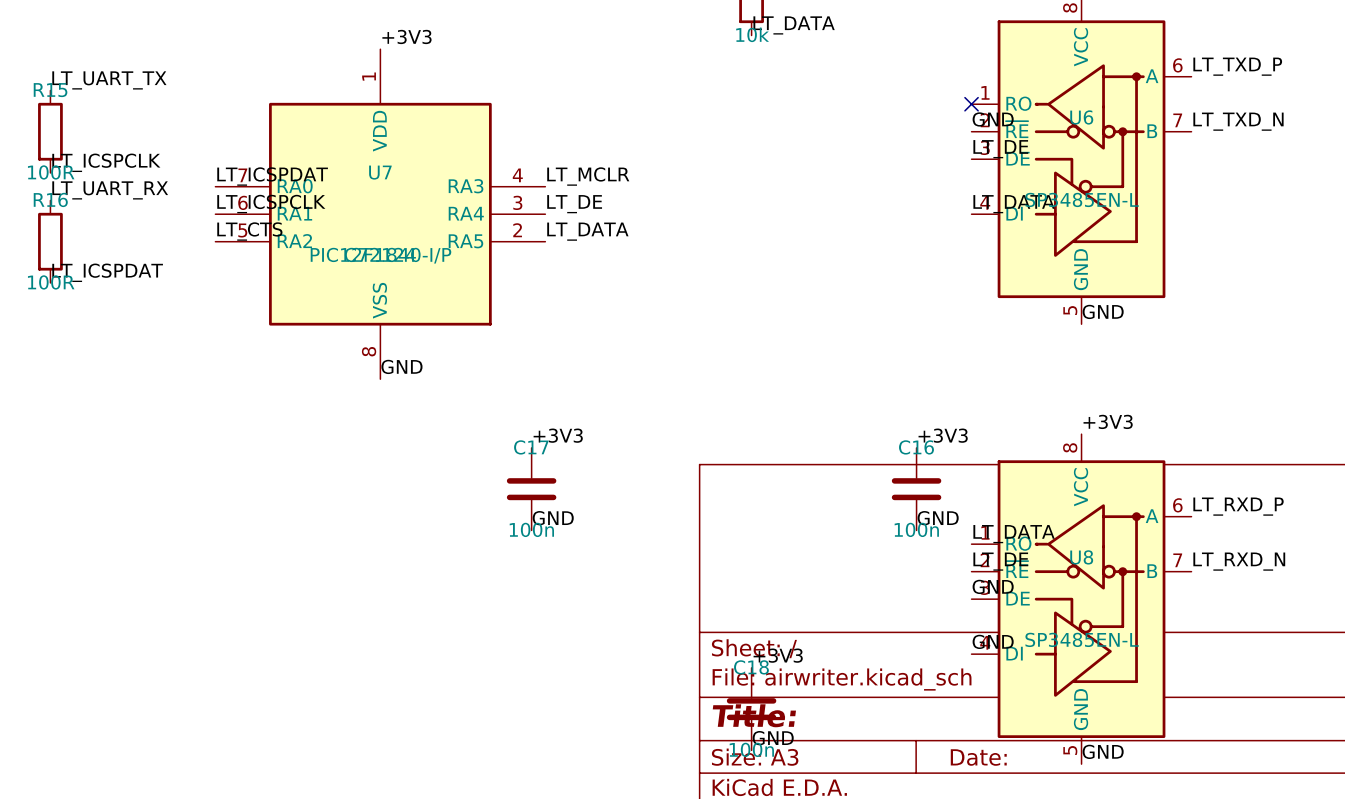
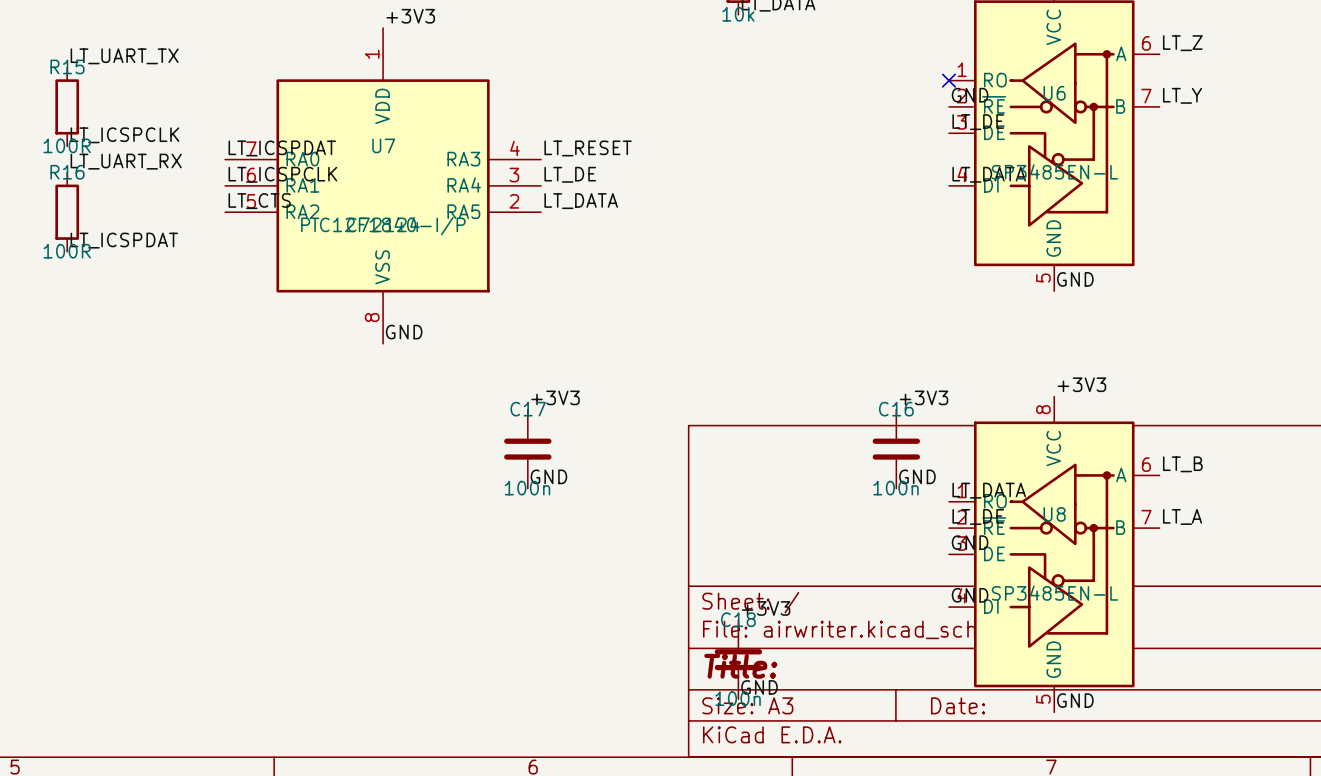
label: LT_TXD_P (1237, 66) -> LT_Z (1182, 43)
label: LT_TXD_N (1238, 121) -> LT_Y (1182, 95)
label: LT_MCLR (588, 176) -> LT_RESET (588, 148)
label: LT_RXD_P (1238, 506) -> LT_B (1182, 464)
label: LT_RXD_N (1239, 561) -> LT_A (1182, 516)

